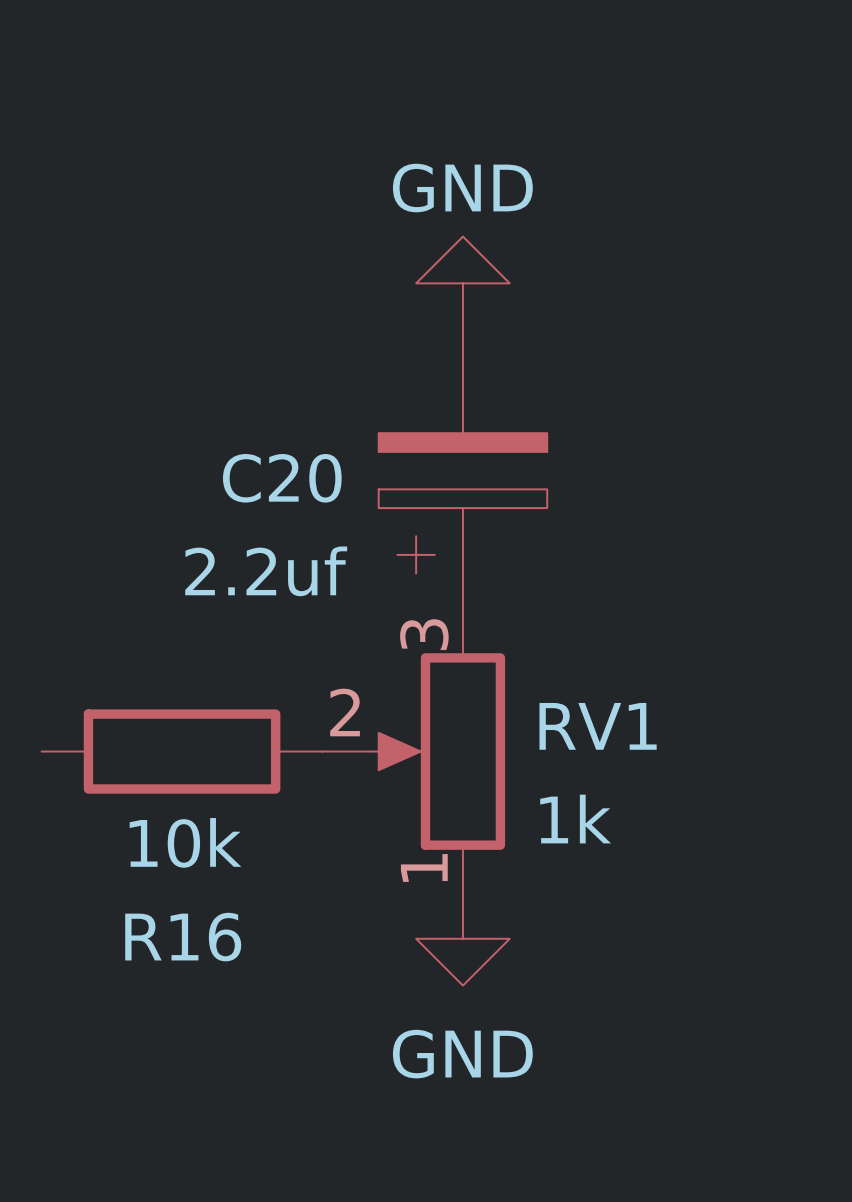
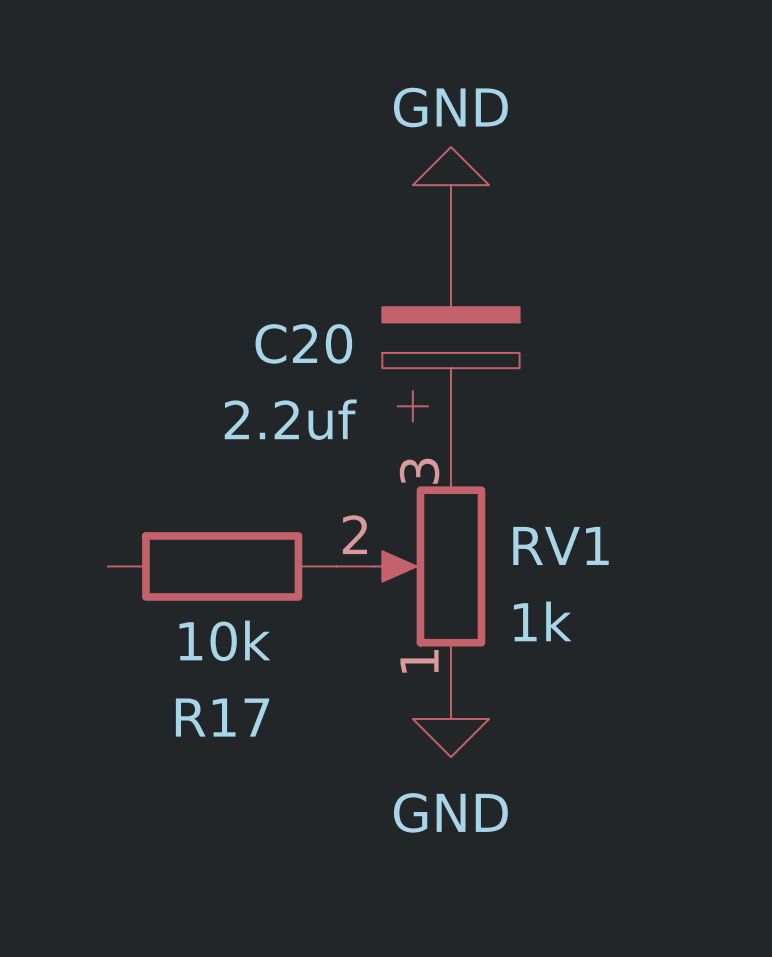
R16 name: R16 (183, 937) -> R17 (222, 717)

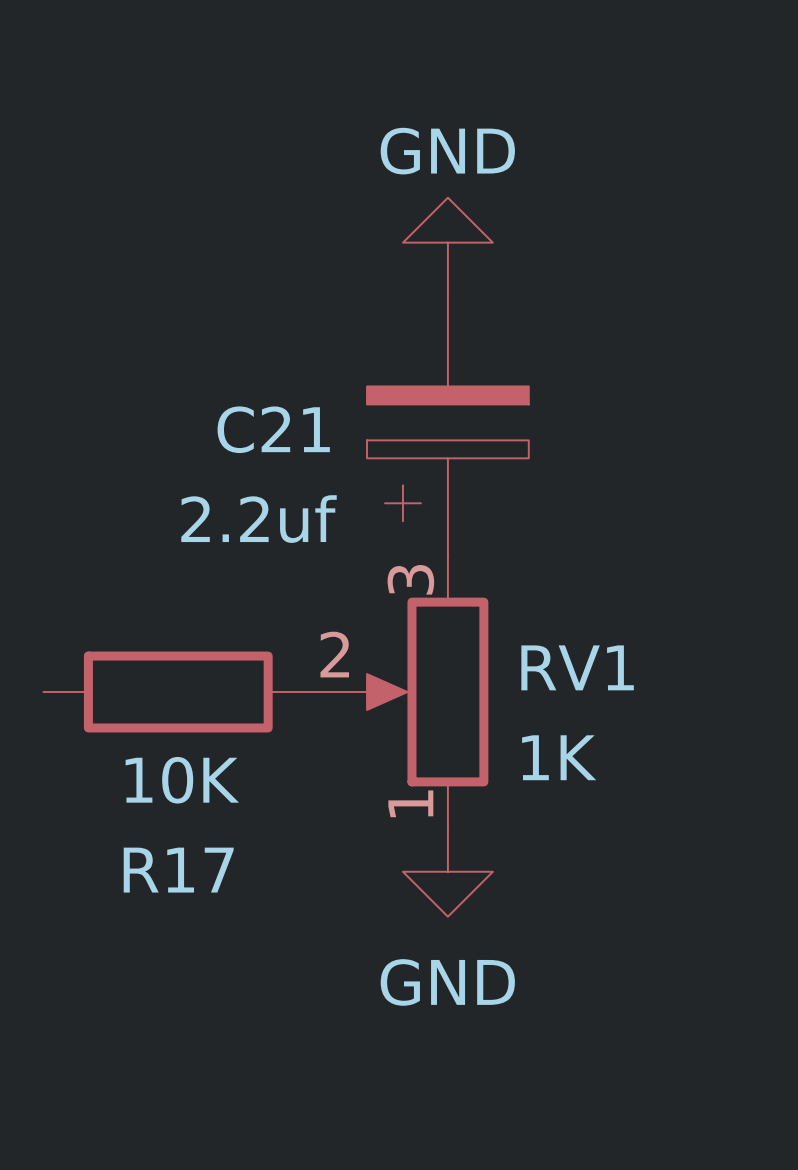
C20 name: C20 (303, 343) -> C21 (273, 429)
RV1 value: 1k (542, 621) -> 1K (559, 757)
R17 value: 10k (224, 640) -> 10K (182, 780)

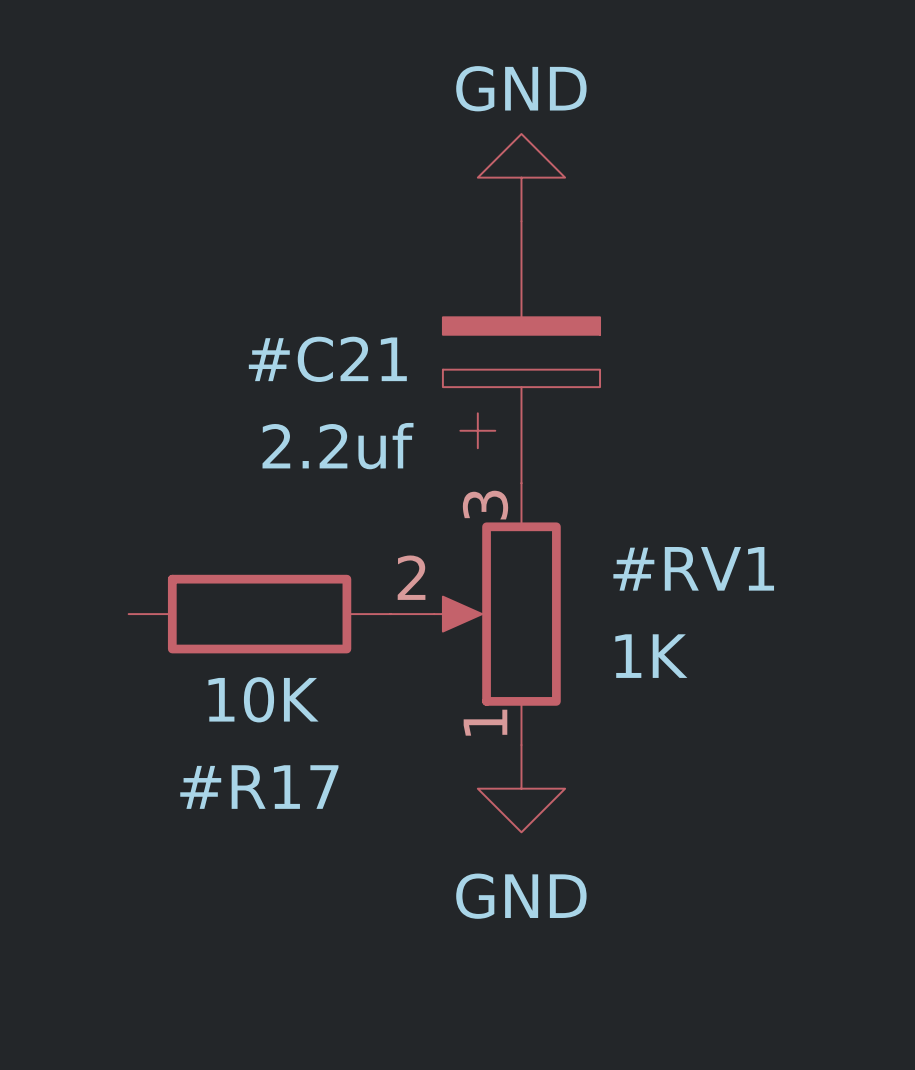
#C21: none -> 2.2uf (521, 352)
R17: 10K (178, 692) -> none
#R17: none -> 10K (259, 614)
RV1: 1K (400, 692) -> none
#RV1: none -> 1K (475, 614)

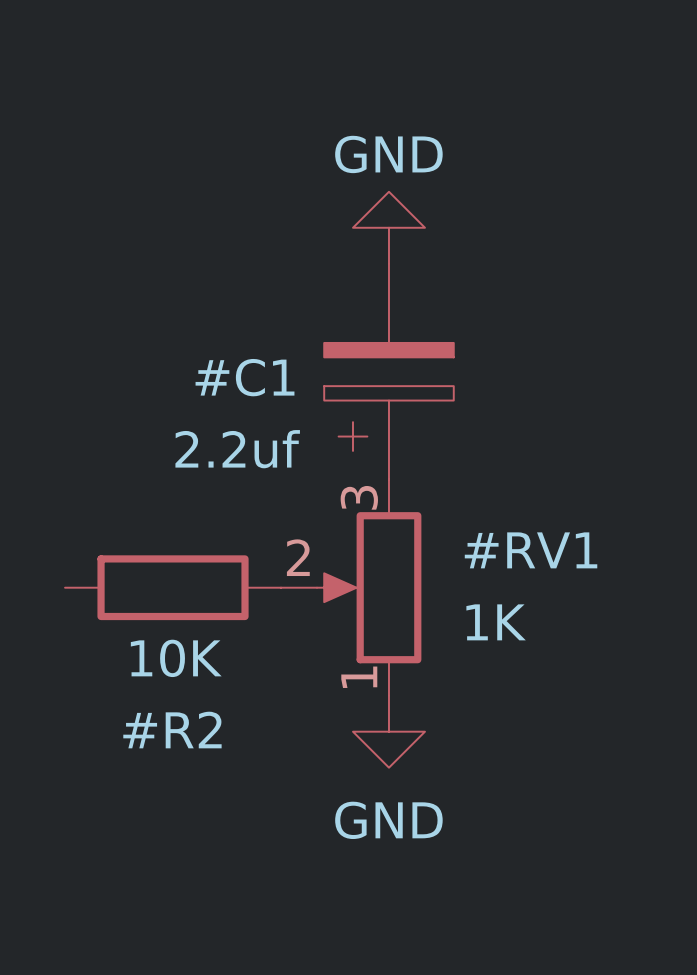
#C21 name: #C21 (327, 359) -> #C1 (245, 377)
#R17 name: #R17 (259, 787) -> #R2 (172, 730)

